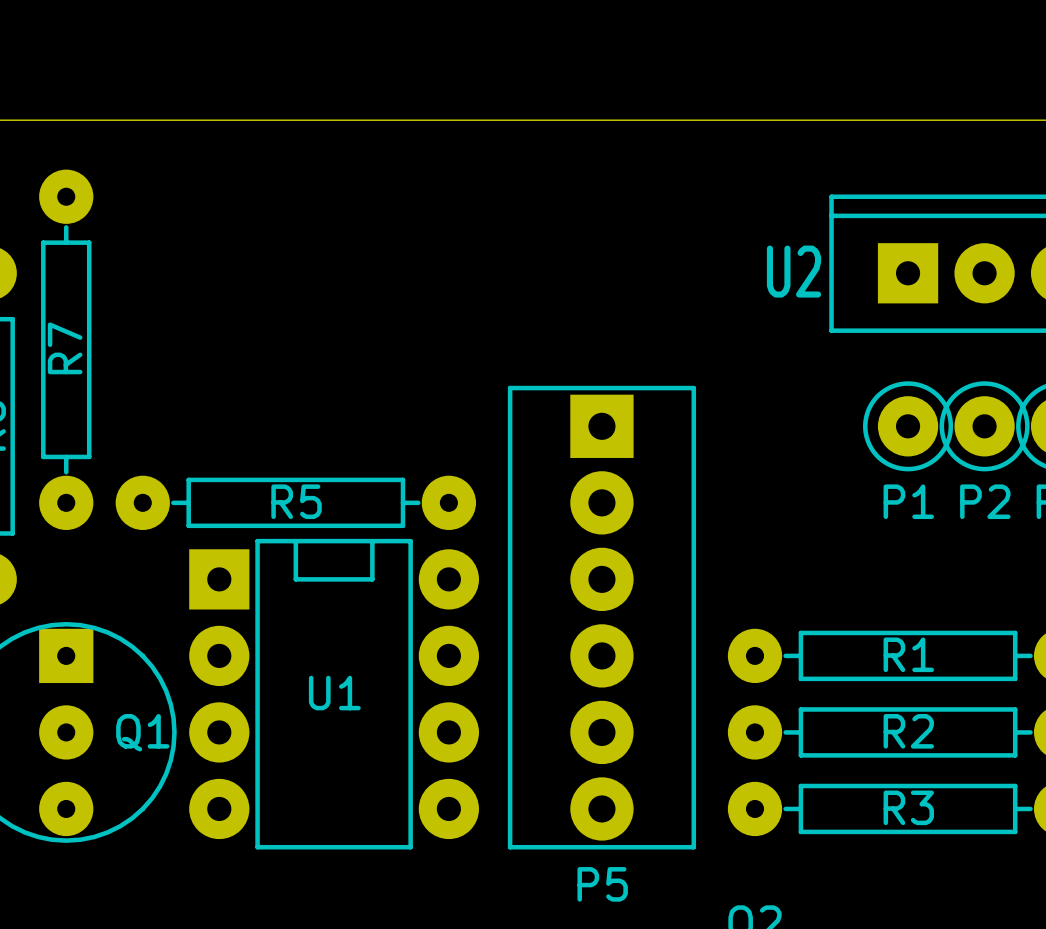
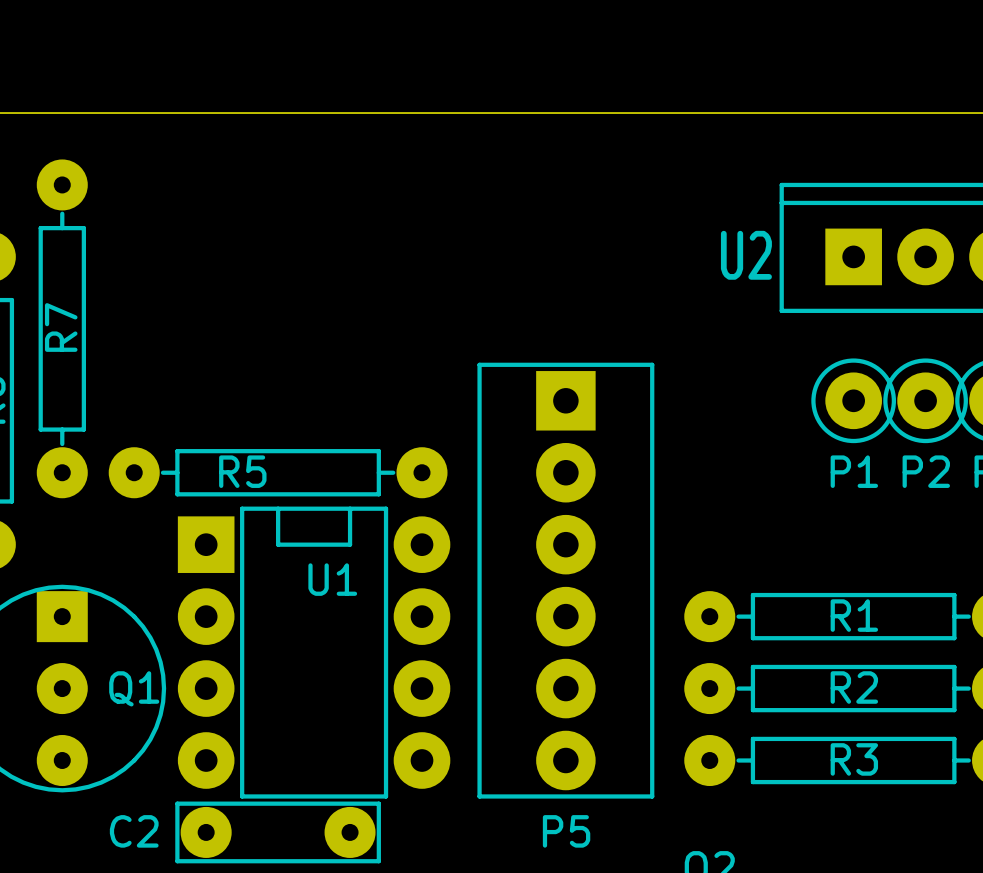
R5 name position: R5 (296, 501) -> R5 (242, 471)
U1 name position: U1 (334, 693) -> U1 (332, 579)
C2: none -> (278, 832)

